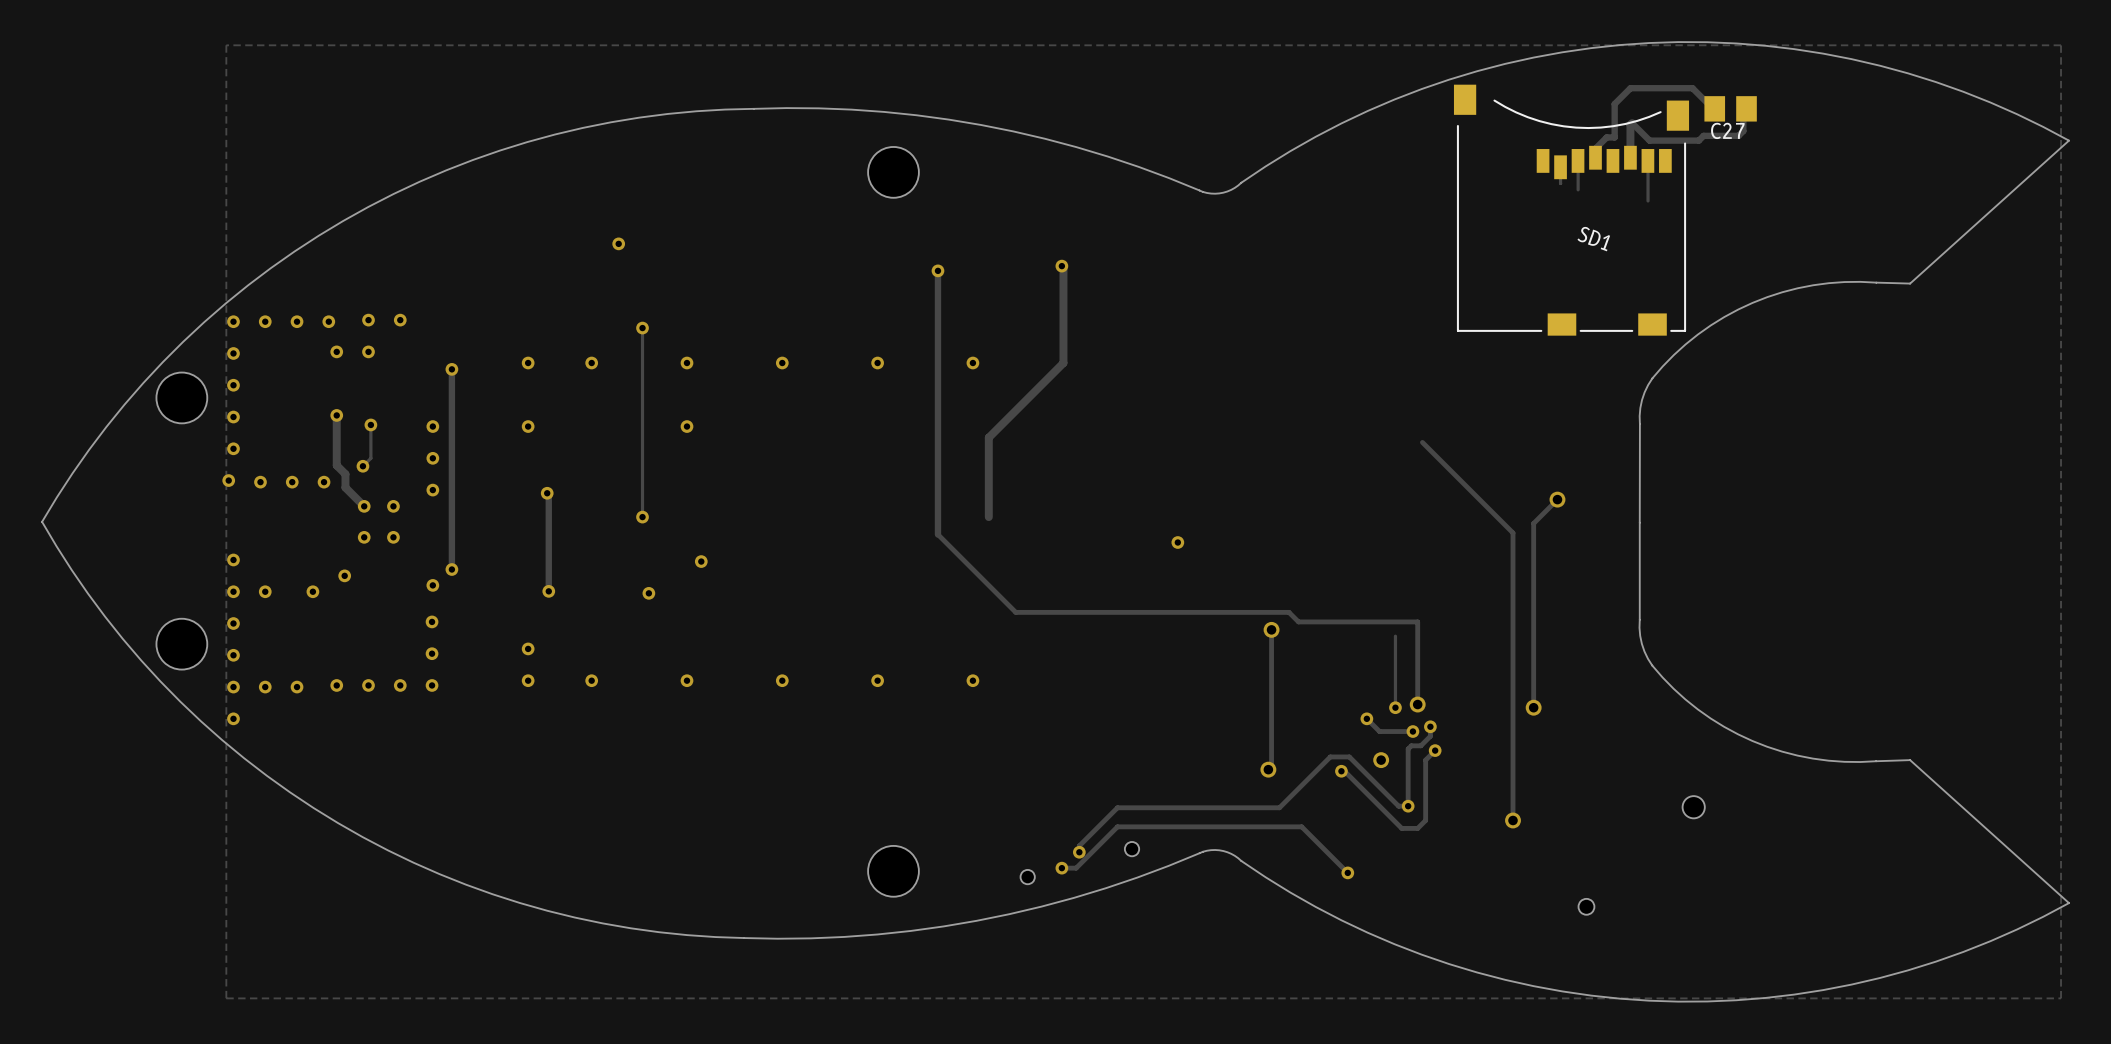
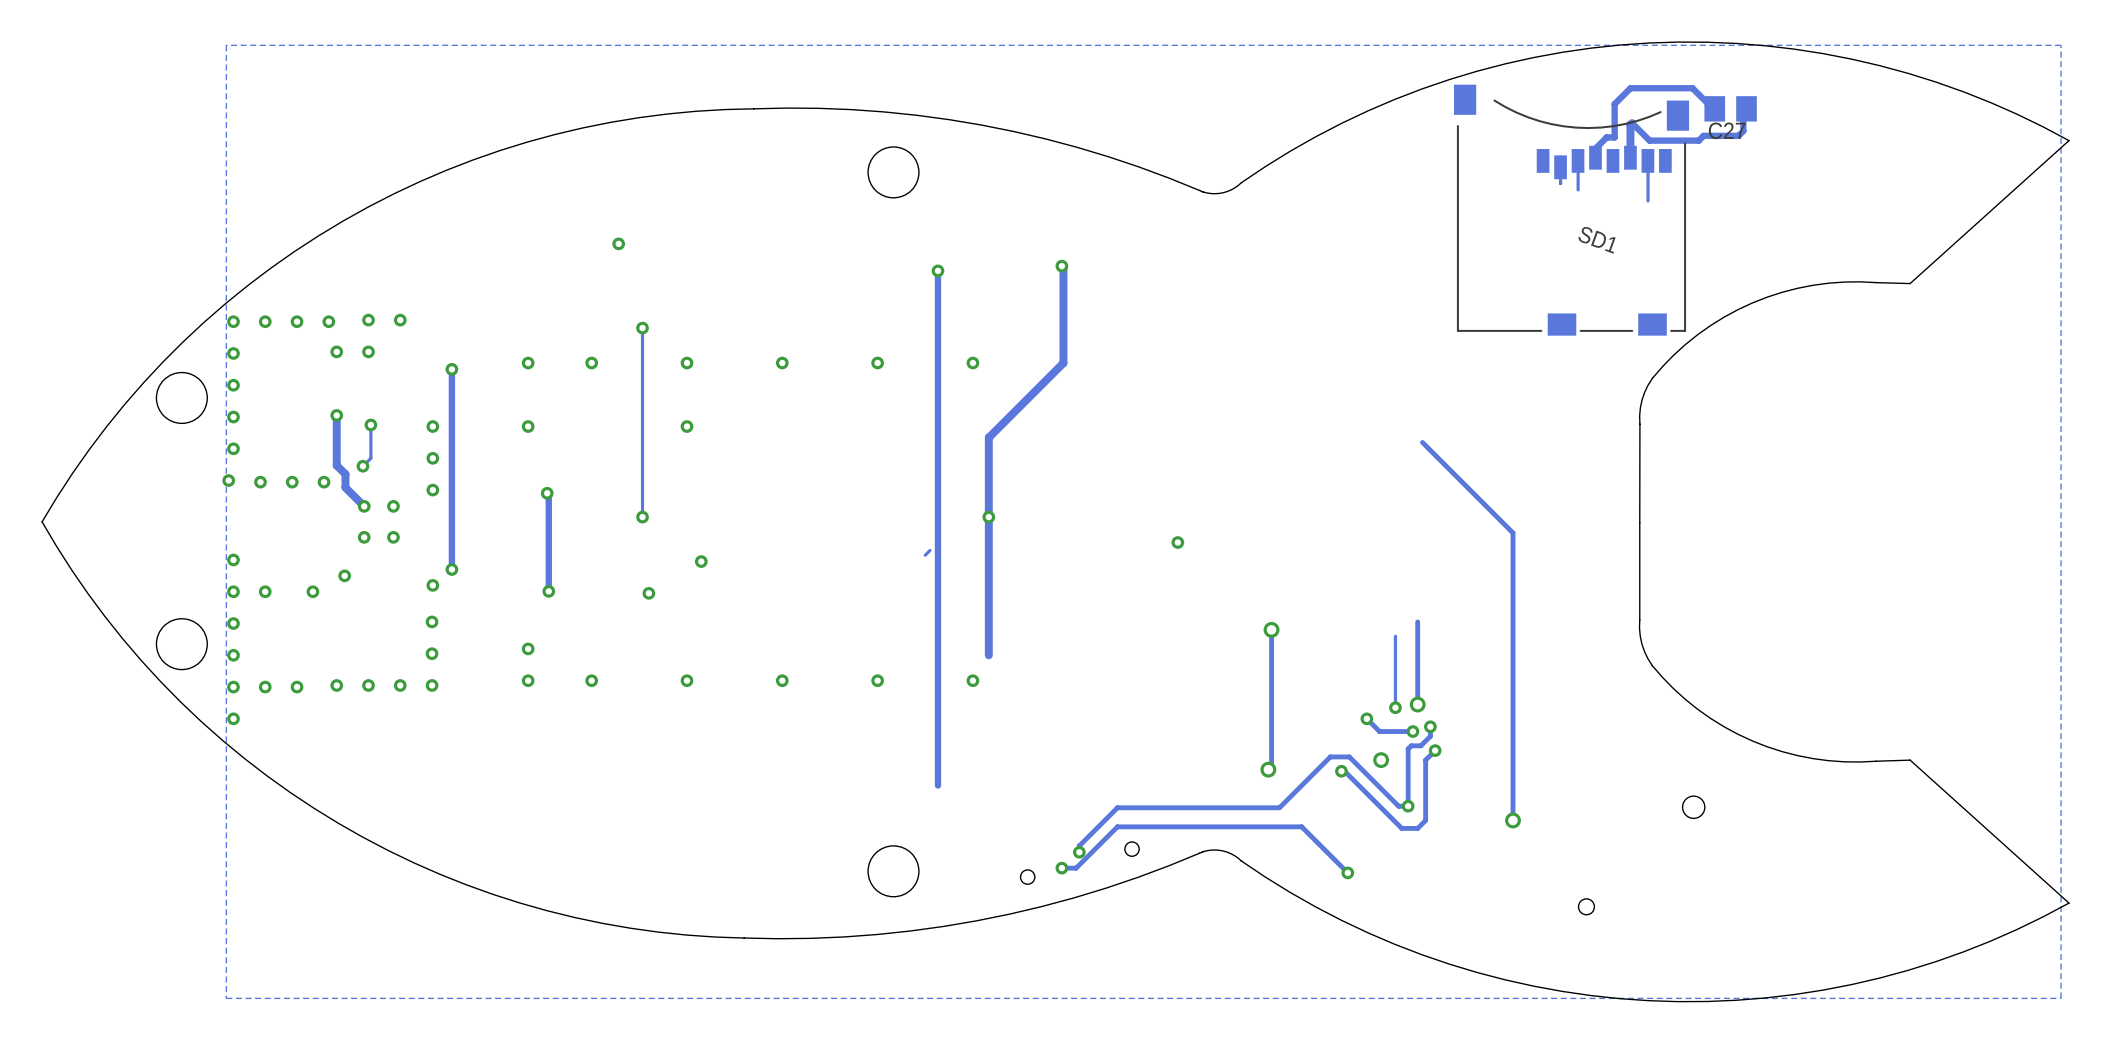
track: (1557, 499) (1533, 523) (1533, 707) -> none
via: (1557, 499) -> none
track: none -> (988, 517) (988, 655)
via: none -> (988, 517)
track: (937, 534) (1015, 612) (1289, 612) (1298, 621) (1417, 621) -> (937, 534) (937, 785)
track: none -> (930, 550) (925, 555)
via: (1533, 707) -> none

